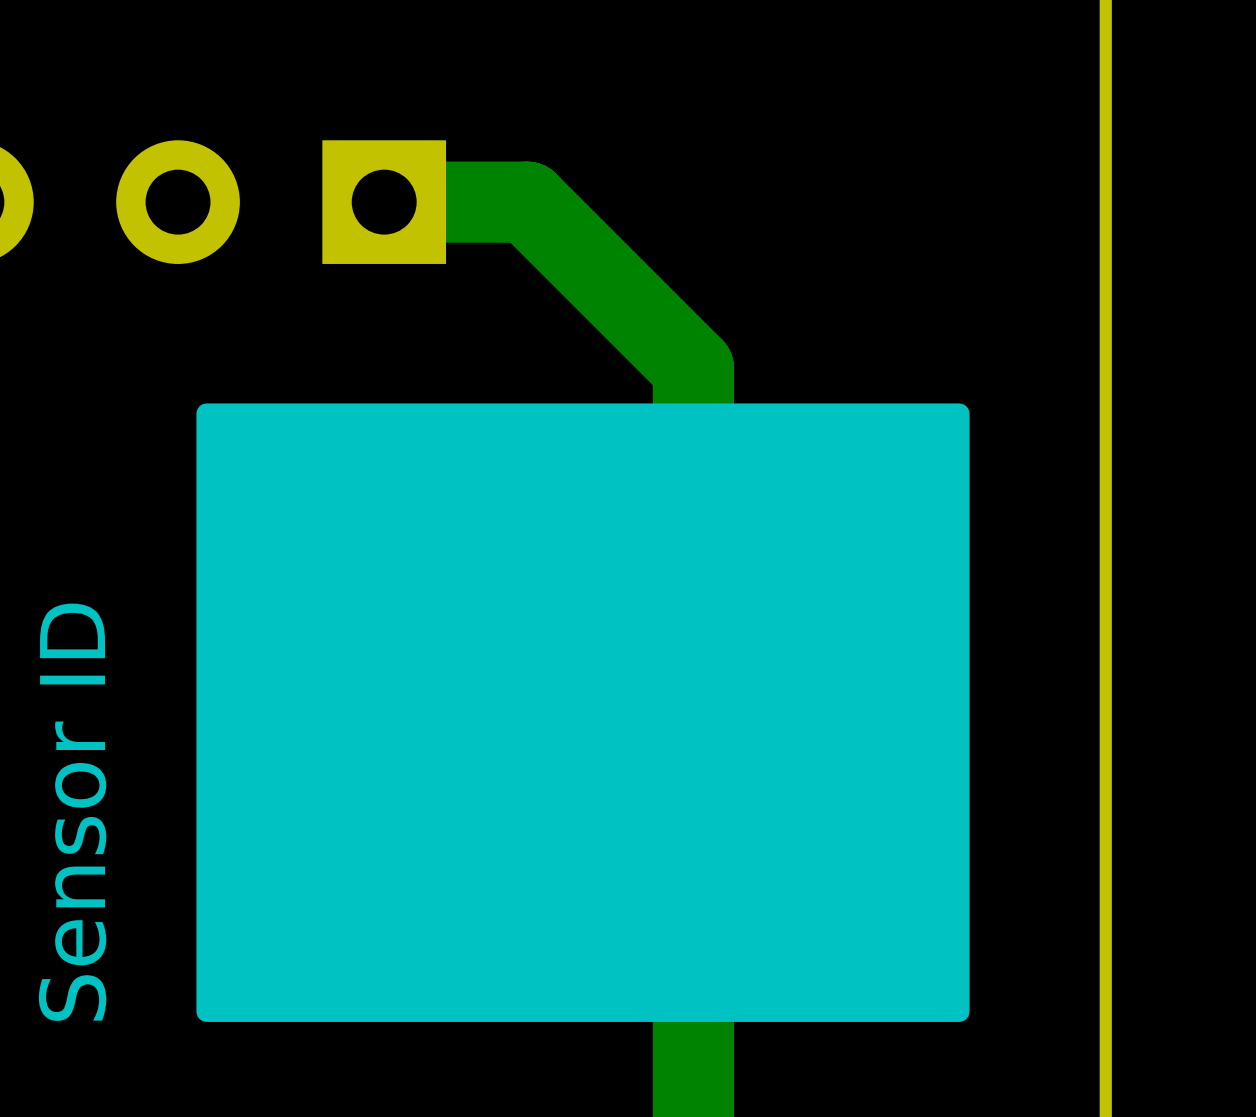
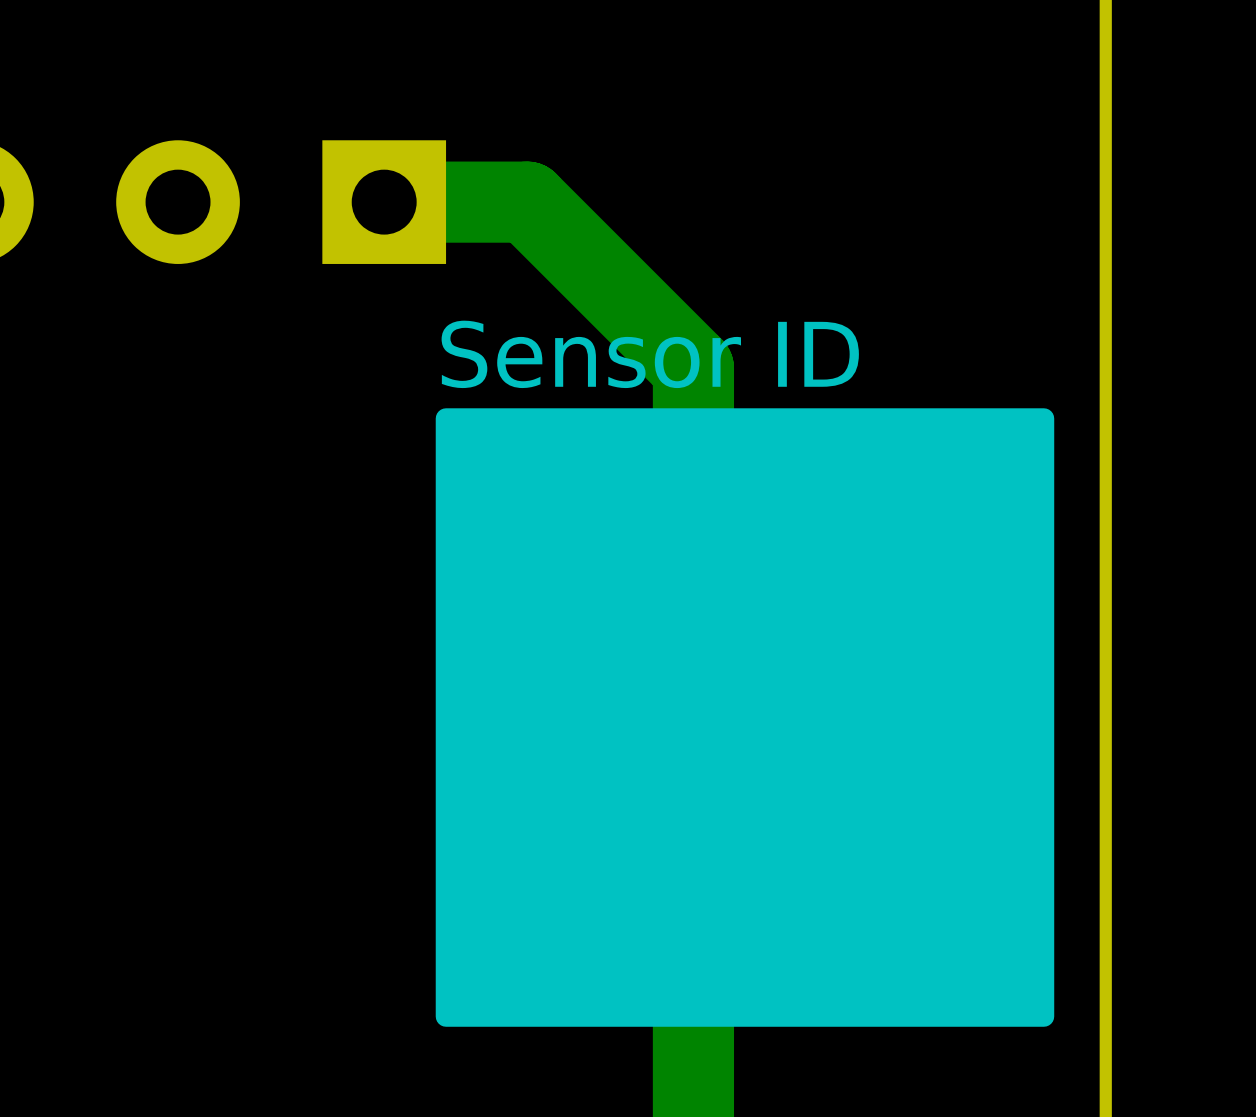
drawing: [196, 403, 970, 1022] -> none
drawing: none -> [435, 408, 1055, 1027]
text rotation: 0° (72, 812) -> 90° clockwise (650, 354)
text position: Sensor ID (72, 812) -> Sensor ID (650, 354)

